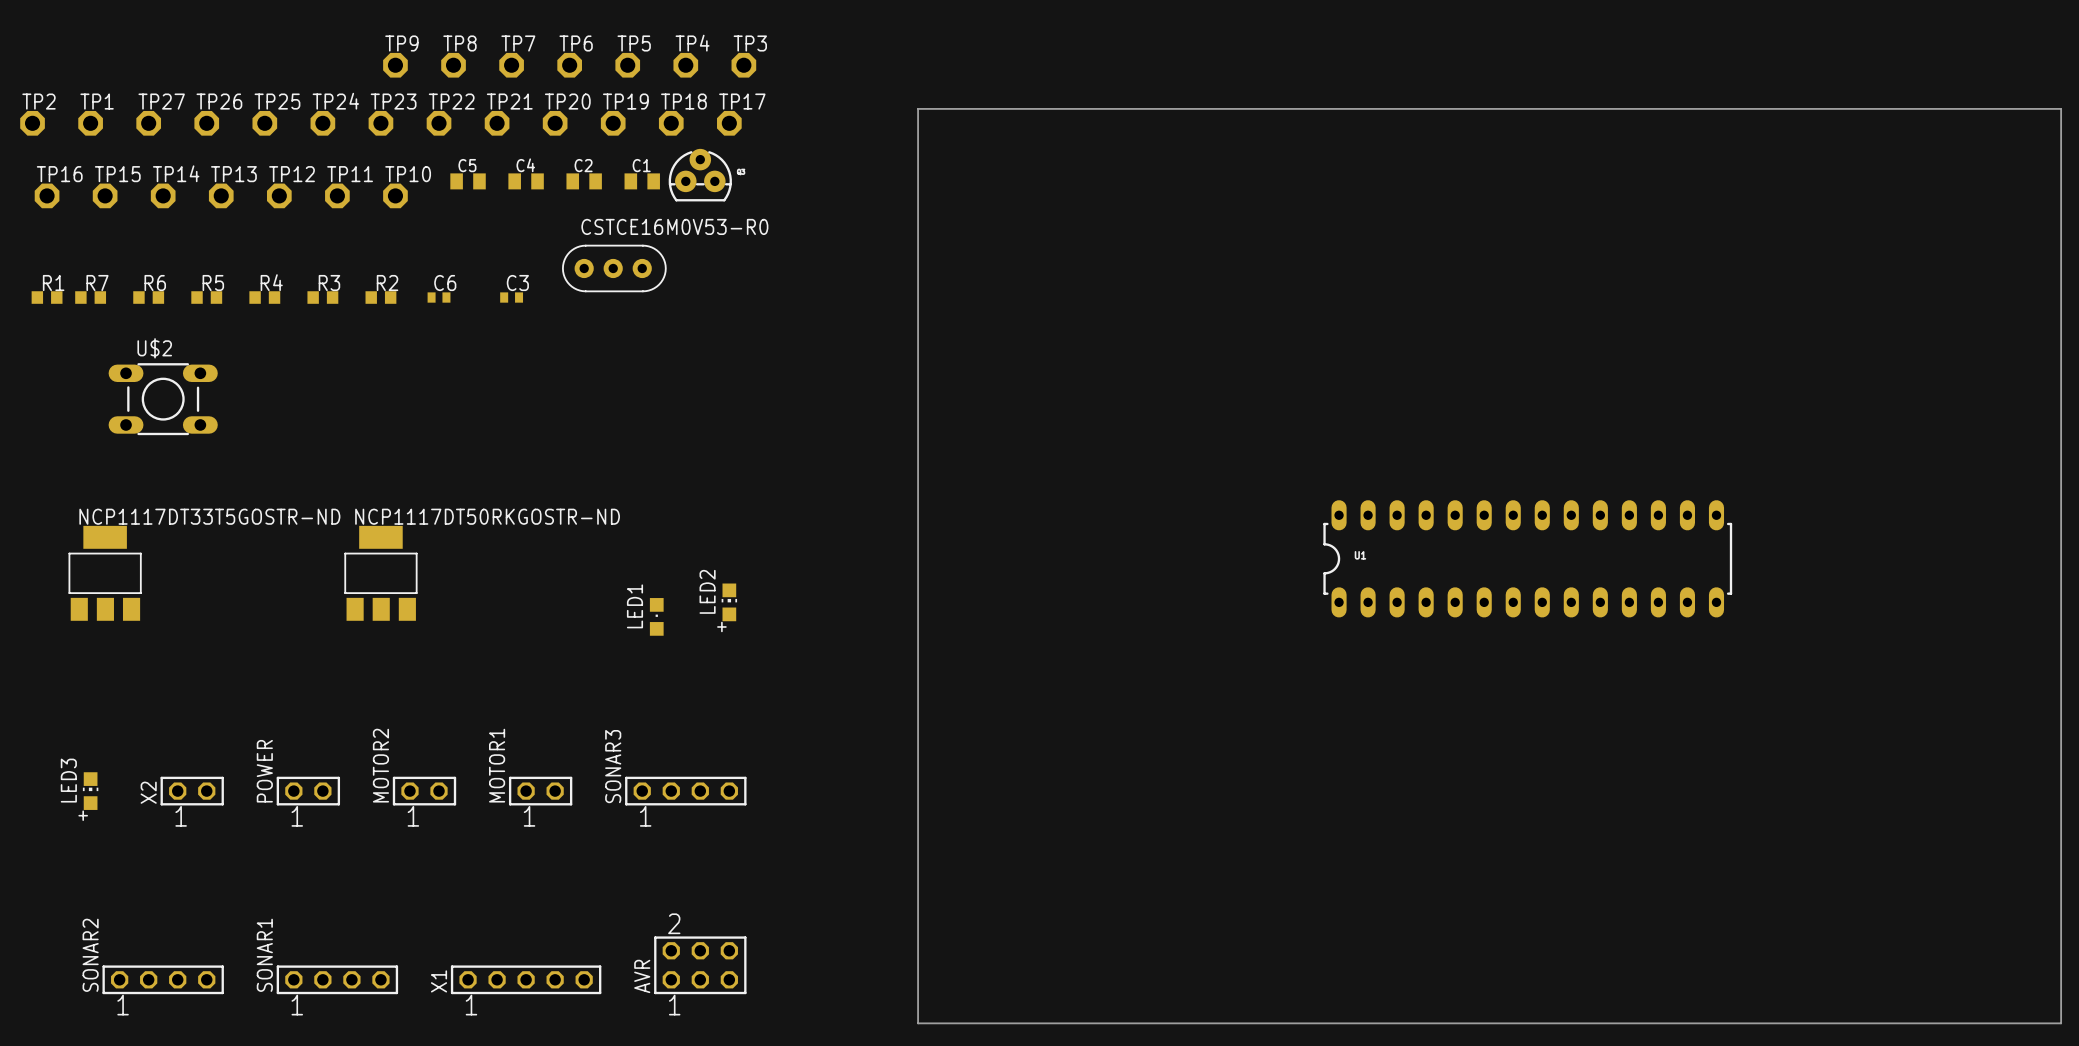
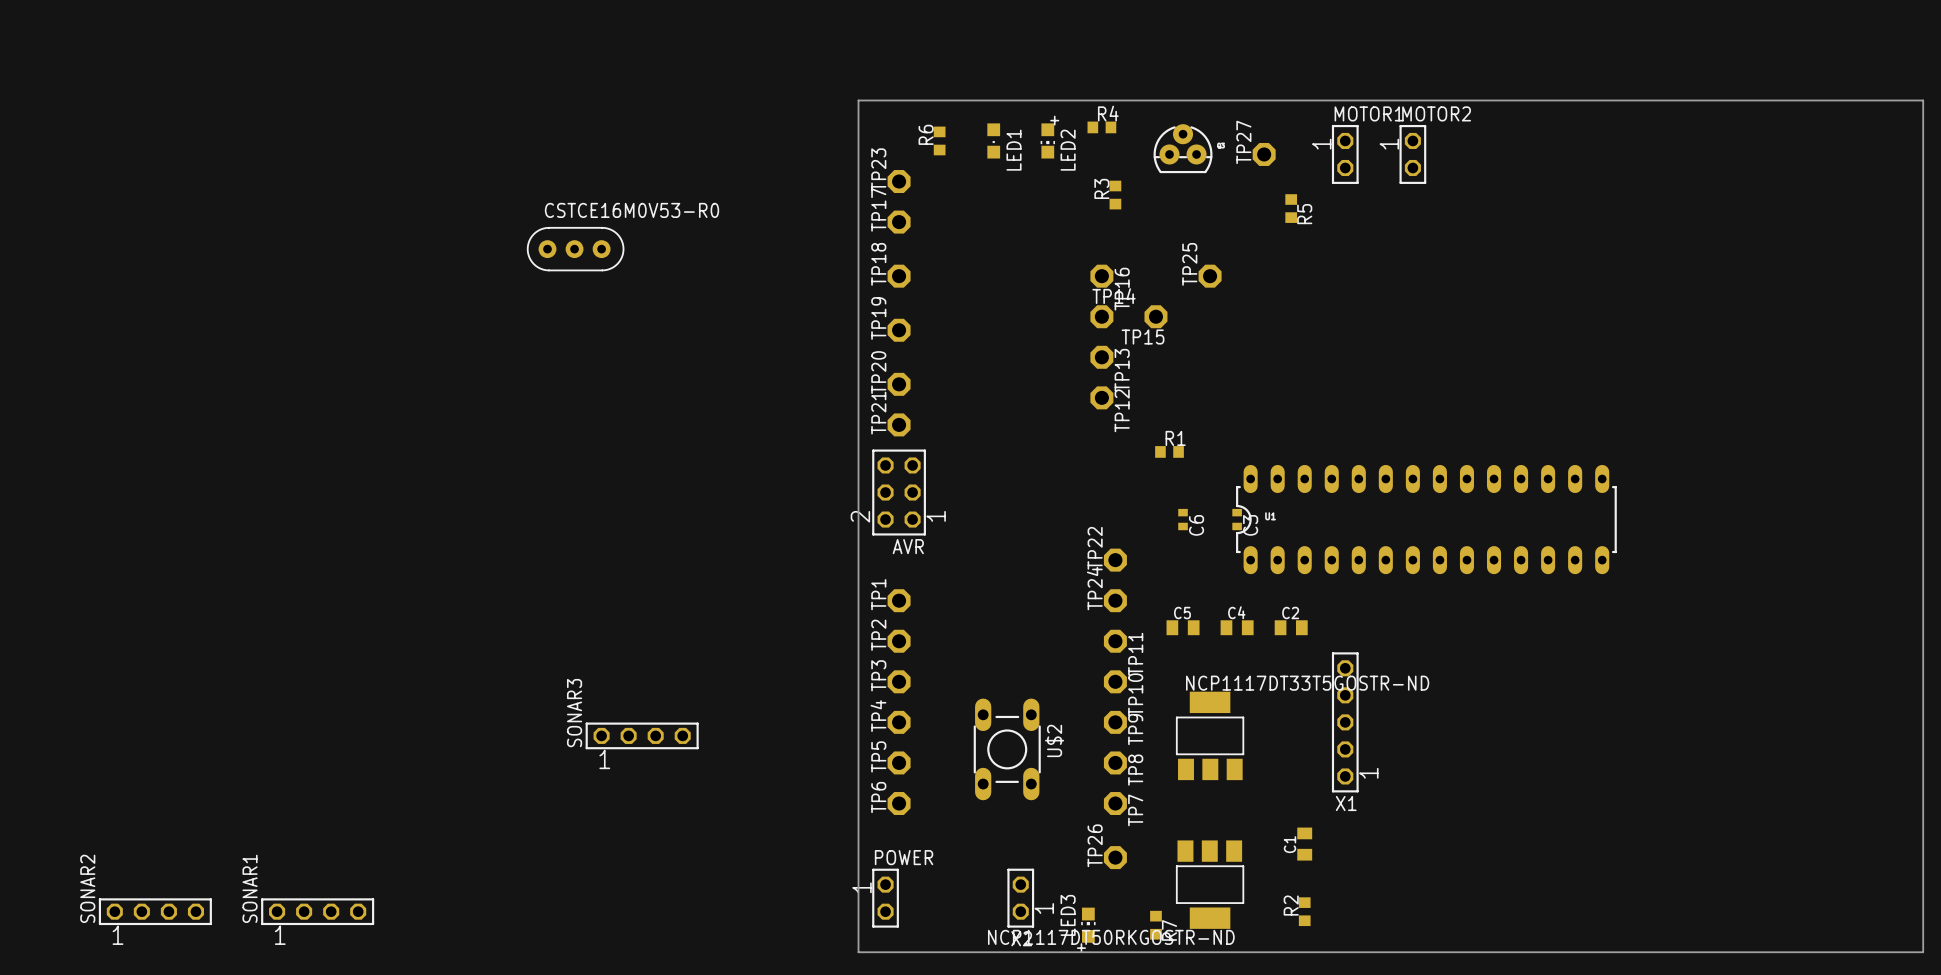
TP9 name rotation: 0° (401, 43) -> 90° counterclockwise (1135, 729)
TP8 name rotation: 0° (459, 43) -> 90° counterclockwise (1135, 770)
TP7 name rotation: 0° (518, 43) -> 90° counterclockwise (1135, 810)
TP6 name rotation: 0° (576, 43) -> 90° counterclockwise (878, 797)
TP5 name rotation: 0° (634, 43) -> 90° counterclockwise (878, 756)
TP4 name rotation: 0° (692, 43) -> 90° counterclockwise (878, 716)
TP3 name rotation: 0° (750, 43) -> 90° counterclockwise (878, 675)
TP9 position: (395, 65) -> (1115, 722)
TP8 position: (453, 65) -> (1115, 762)
TP7 position: (511, 65) -> (1115, 803)
TP6 position: (569, 65) -> (899, 803)
TP5 position: (627, 65) -> (899, 762)
TP4 position: (685, 65) -> (899, 722)
TP3 position: (743, 65) -> (899, 681)
TP2 name rotation: 0° (38, 101) -> 90° counterclockwise (878, 635)
TP1 name rotation: 0° (97, 101) -> 90° counterclockwise (878, 594)
TP27 name rotation: 0° (161, 101) -> 90° counterclockwise (1243, 142)
TP26 name rotation: 0° (219, 101) -> 90° counterclockwise (1095, 845)
TP25 name rotation: 0° (277, 101) -> 90° counterclockwise (1189, 264)
TP24 name rotation: 0° (335, 101) -> 90° counterclockwise (1094, 588)
TP23 name rotation: 0° (393, 101) -> 90° counterclockwise (878, 169)
TP22 name rotation: 0° (451, 101) -> 90° counterclockwise (1095, 548)
TP21 name rotation: 0° (509, 101) -> 90° counterclockwise (878, 413)
TP20 name rotation: 0° (567, 101) -> 90° counterclockwise (878, 372)
TP19 name rotation: 0° (625, 101) -> 90° counterclockwise (878, 318)
TP18 name rotation: 0° (683, 101) -> 90° counterclockwise (878, 264)
TP17 name rotation: 0° (742, 101) -> 90° counterclockwise (878, 209)
TP2 position: (32, 123) -> (899, 641)
TP1 position: (90, 123) -> (899, 600)
TP27 position: (148, 123) -> (1264, 154)
TP26 position: (206, 123) -> (1115, 857)
TP25 position: (264, 123) -> (1210, 276)
TP24 position: (322, 123) -> (1115, 600)
TP23 position: (380, 123) -> (899, 181)
TP22 position: (439, 123) -> (1115, 560)
TP21 position: (497, 123) -> (899, 424)
TP20 position: (555, 123) -> (899, 384)
TP19 position: (613, 123) -> (899, 330)
TP18 position: (671, 123) -> (899, 276)
TP17 position: (729, 123) -> (899, 222)
TP16 name rotation: 0° (59, 174) -> 90° counterclockwise (1122, 289)
TP15 name position: TP15 (117, 174) -> TP15 (1143, 337)
TP13 name rotation: 0° (233, 174) -> 90° counterclockwise (1122, 370)
TP12 name rotation: 0° (292, 174) -> 90° counterclockwise (1122, 410)
TP11 name rotation: 0° (350, 174) -> 90° counterclockwise (1135, 654)
TP10 name rotation: 0° (408, 174) -> 90° counterclockwise (1135, 694)
part position: (700, 175) -> (1183, 148)
C5 position: (468, 181) -> (1183, 627)
C4 position: (526, 181) -> (1237, 627)
C2 position: (584, 181) -> (1291, 627)
C1 rotation: 0° (642, 181) -> 90° clockwise (1304, 844)
C1 position: (642, 181) -> (1304, 844)
TP16 position: (47, 195) -> (1101, 276)
TP15 position: (105, 195) -> (1155, 316)
TP14 position: (163, 195) -> (1101, 316)
TP13 position: (221, 195) -> (1101, 357)
TP12 position: (279, 195) -> (1101, 397)
TP11 position: (337, 195) -> (1115, 641)
TP10 position: (395, 195) -> (1115, 681)
R6 name position: R6 (155, 283) -> R6 (926, 134)
R3 name position: R3 (329, 283) -> R3 (1101, 188)
R2 name position: R2 (387, 283) -> R2 (1291, 905)
R1 position: (47, 297) -> (1169, 451)
R7 rotation: 0° (90, 297) -> 90° clockwise (1155, 925)
R7 position: (90, 297) -> (1155, 925)
R6 rotation: 0° (148, 297) -> 90° clockwise (939, 140)
R6 position: (148, 297) -> (939, 140)
R5 rotation: 0° (206, 297) -> 90° clockwise (1291, 208)
R5 position: (206, 297) -> (1291, 208)
R4 position: (264, 297) -> (1101, 127)
R3 rotation: 0° (322, 297) -> 90° clockwise (1115, 195)
R3 position: (322, 297) -> (1115, 195)
R2 rotation: 0° (380, 297) -> 90° clockwise (1304, 911)
R2 position: (380, 297) -> (1304, 911)
C6 rotation: 0° (439, 297) -> 90° clockwise (1183, 519)
C6 position: (439, 297) -> (1183, 519)
C3 rotation: 0° (511, 297) -> 90° clockwise (1237, 519)
C3 position: (511, 297) -> (1237, 519)
U$2 rotation: 0° (163, 399) -> 90° clockwise (1007, 749)
U$2 position: (163, 399) -> (1007, 749)
AVR: none -> (899, 492)
NCP1117DT33T5GOSTR-ND position: (105, 573) -> (1210, 735)
NCP1117DT50RKGOSTR-ND rotation: 0° (380, 573) -> 180° (1210, 884)
NCP1117DT50RKGOSTR-ND position: (380, 573) -> (1210, 884)
LED2 footprint: [721, 583, 738, 622] -> [1040, 123, 1055, 159]
LED2 name position: LED2 (707, 591) -> LED2 (1068, 150)
LED1 rotation: 0° (656, 616) -> 180° (993, 140)
LED1 position: (656, 616) -> (993, 140)
MOTOR2 name position: MOTOR2 (380, 765) -> MOTOR2 (1436, 113)
MOTOR1 name position: MOTOR1 (497, 765) -> MOTOR1 (1368, 113)
MOTOR2 footprint: [392, 776, 457, 806] -> [1399, 124, 1427, 184]
MOTOR1 footprint: [508, 776, 573, 806] -> [1331, 124, 1359, 184]
LED3 position: (90, 791) -> (1088, 925)
X2 rotation: 0° (192, 791) -> 90° counterclockwise (1020, 898)
X2 position: (192, 791) -> (1020, 898)
POWER: (308, 791) -> none
AVR: (700, 965) -> none
POWER: none -> (885, 898)
X1 rotation: 0° (526, 979) -> 90° counterclockwise (1345, 722)
X1 position: (526, 979) -> (1345, 722)

